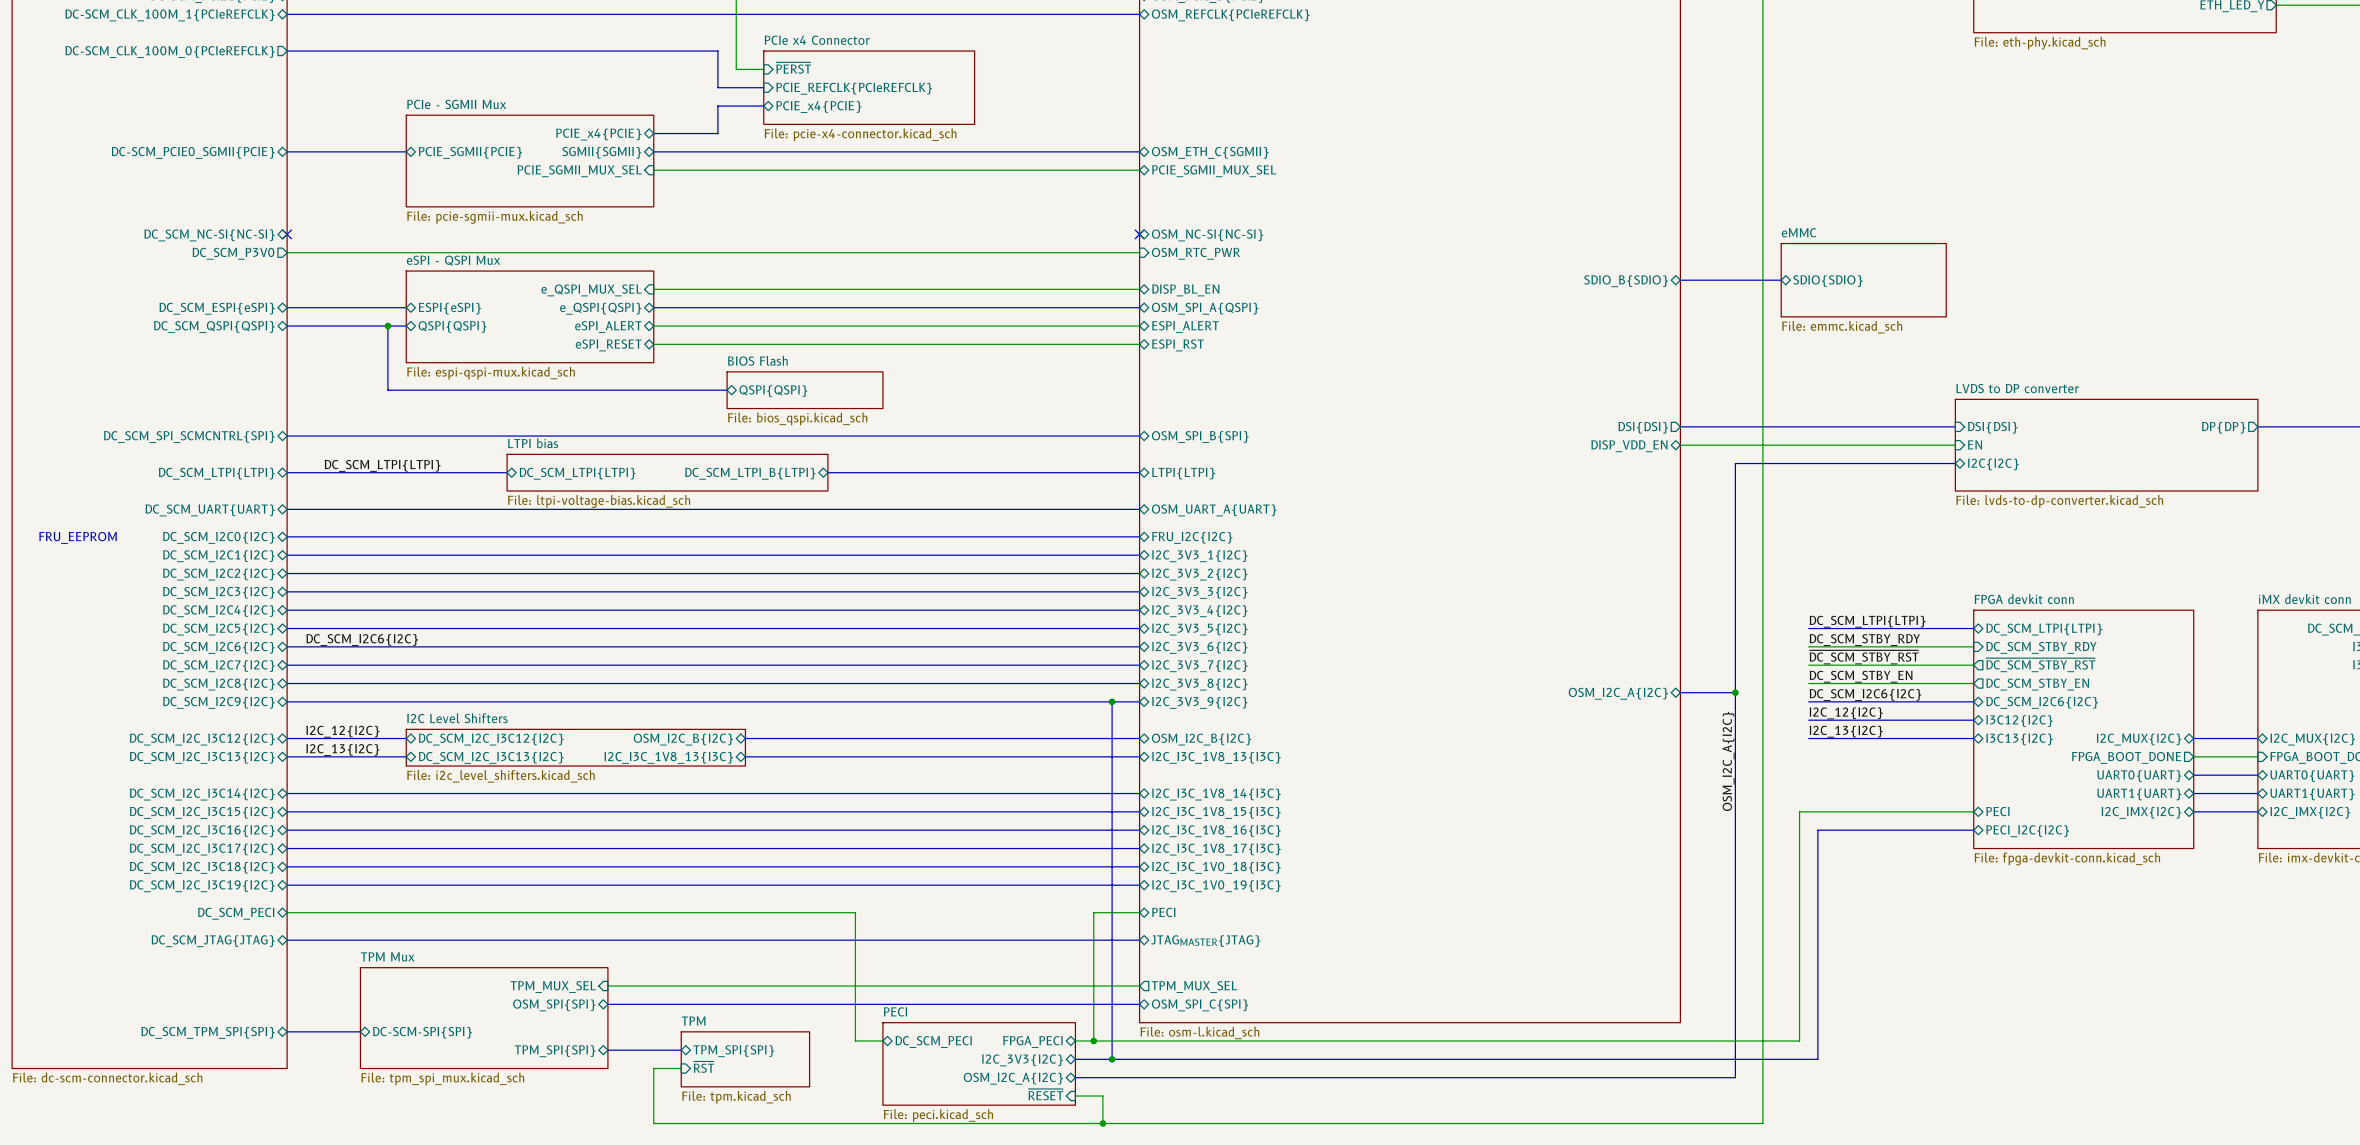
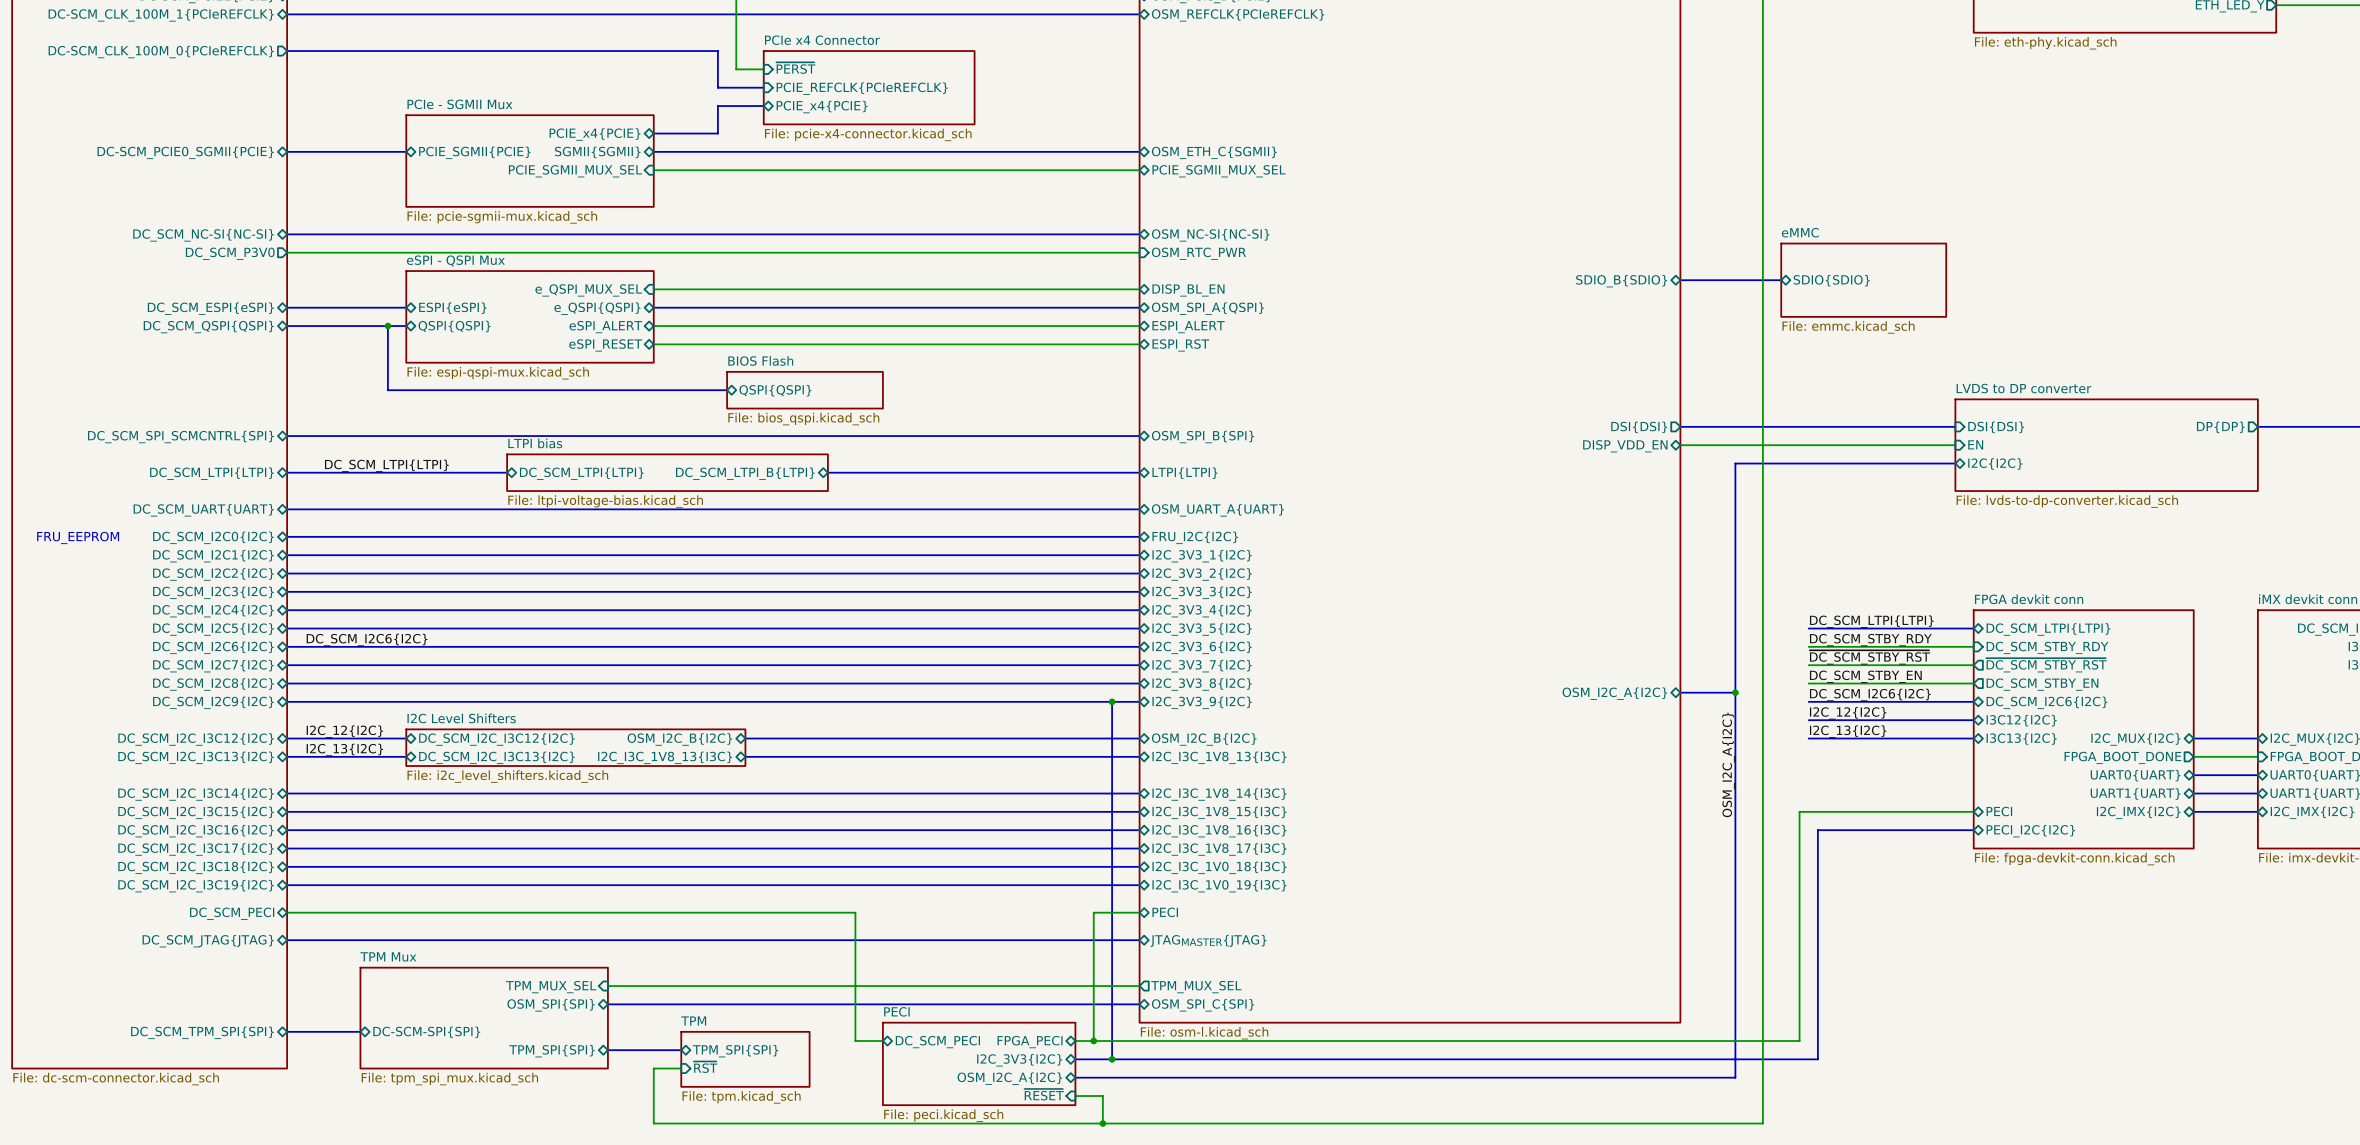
bus: none -> (287, 234) (1139, 234)
no-connect mark: (287, 234) -> none
no-connect mark: (1139, 234) -> none

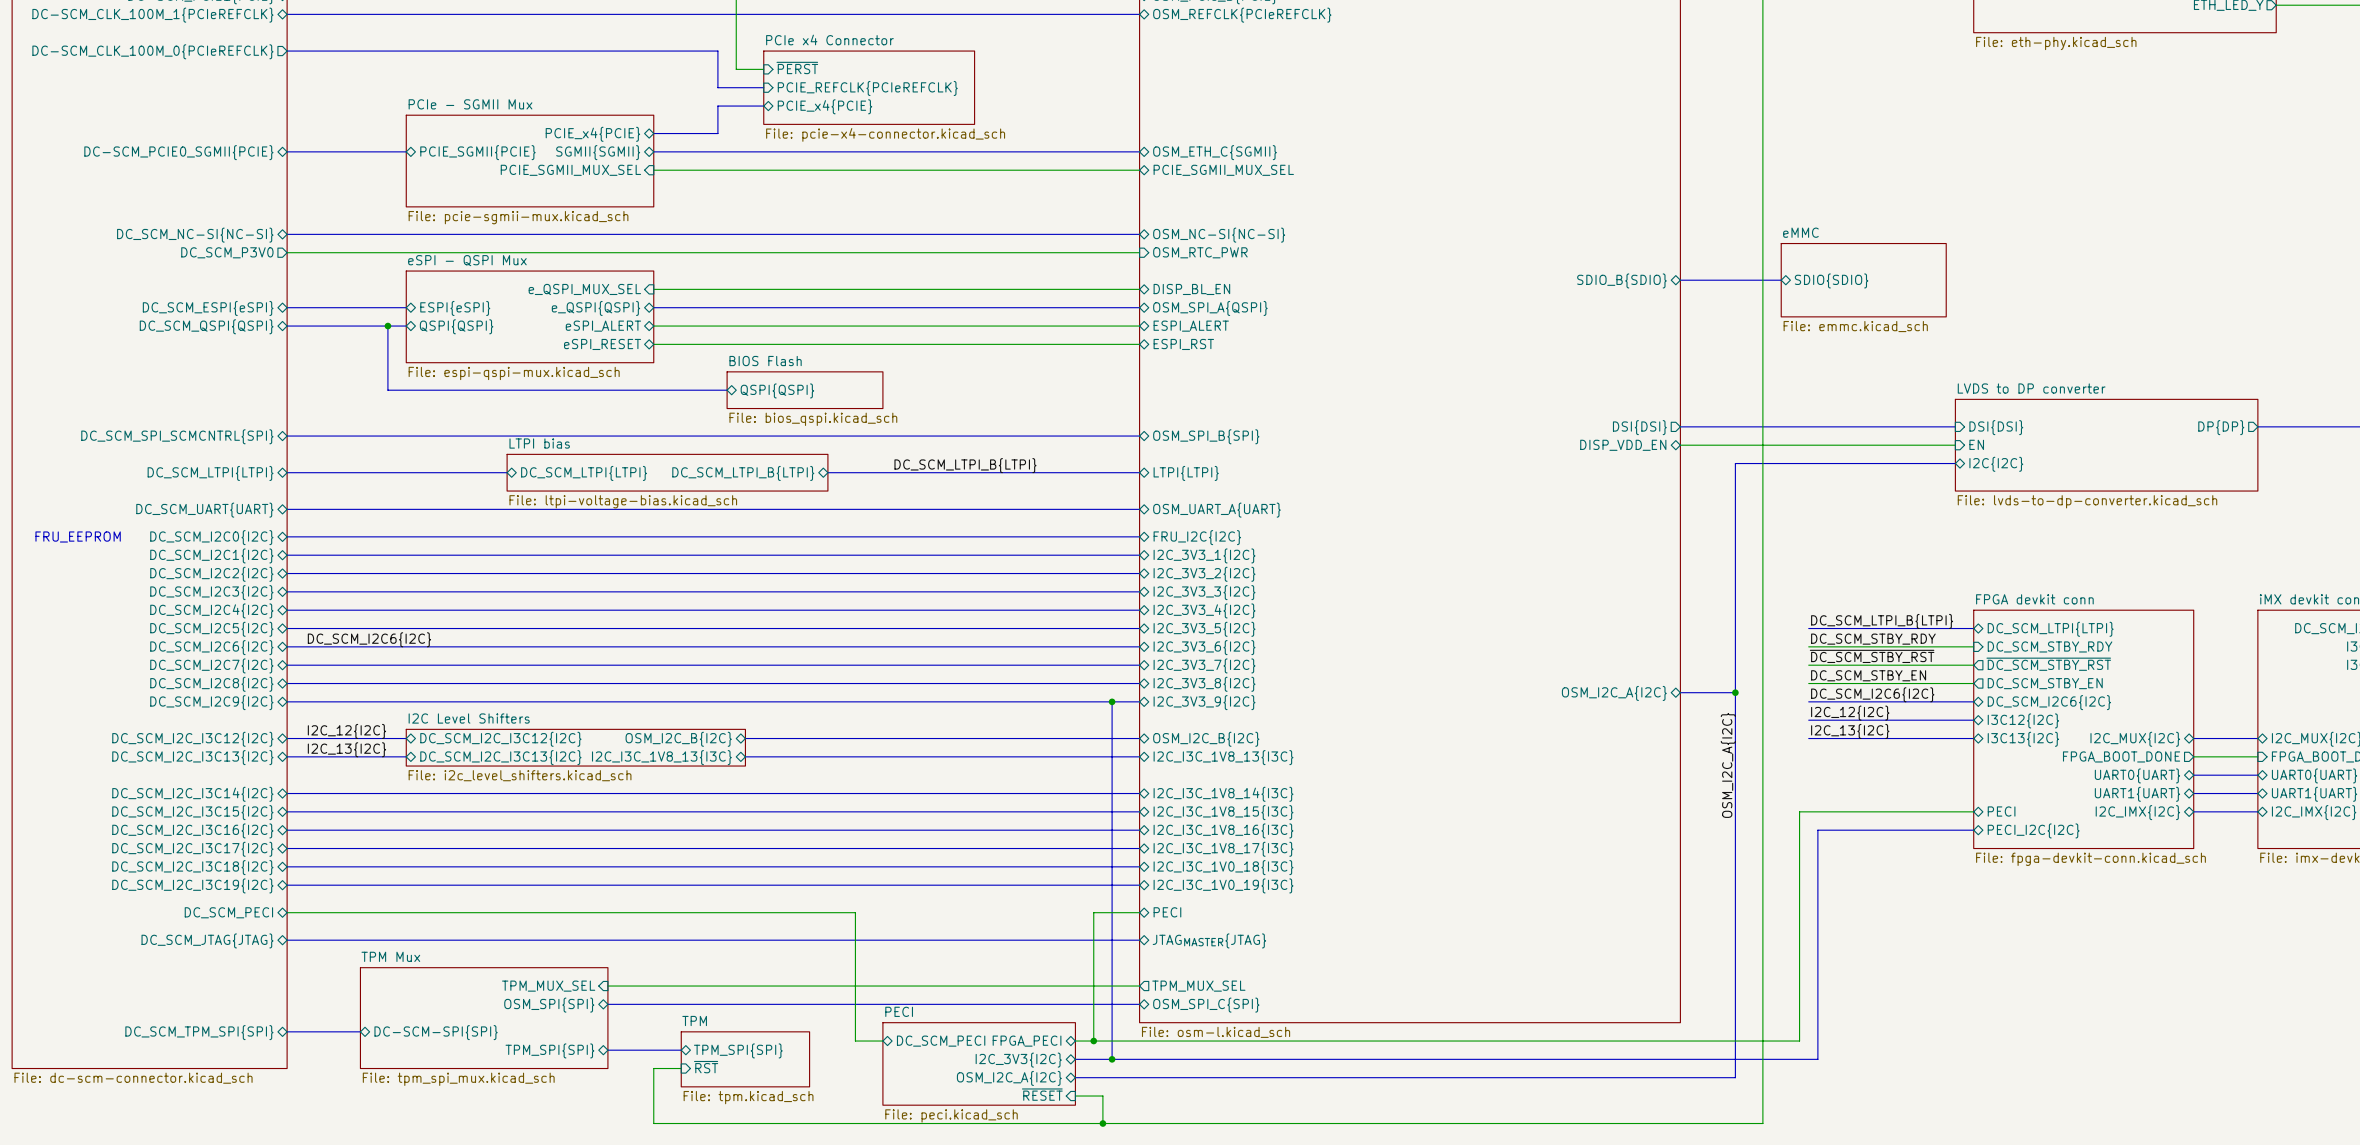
label: DC_SCM_LTPI{LTPI} (386, 465) -> none
label: none -> DC_SCM_LTPI_B{LTPI} (965, 465)
label: DC_SCM_LTPI{LTPI} (1871, 621) -> DC_SCM_LTPI_B{LTPI} (1882, 621)

